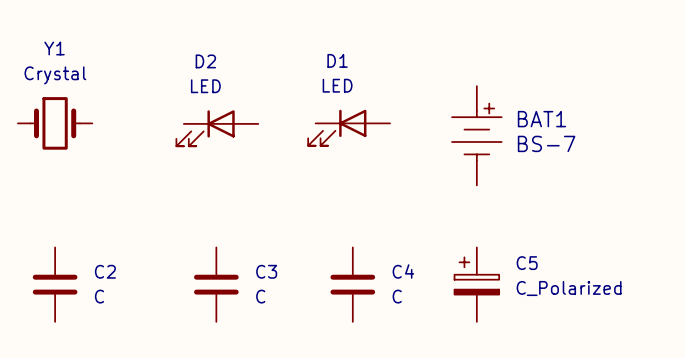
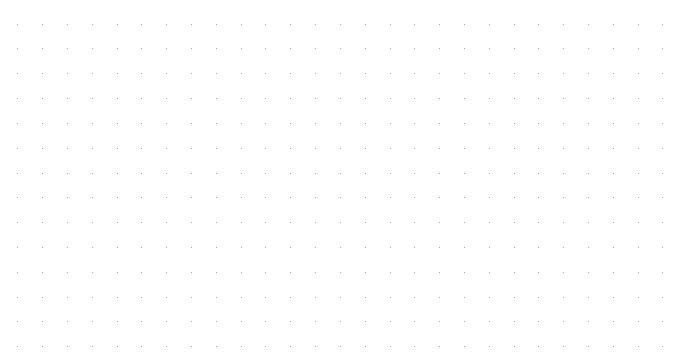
Y1: Crystal (55, 123) -> none
D1: LED (349, 127) -> none
D2: LED (217, 128) -> none
BAT1: BS-7 (476, 135) -> none
C2: C (55, 284) -> none
C3: C (216, 284) -> none
C4: C (352, 284) -> none
C5: C_Polarized (476, 284) -> none

